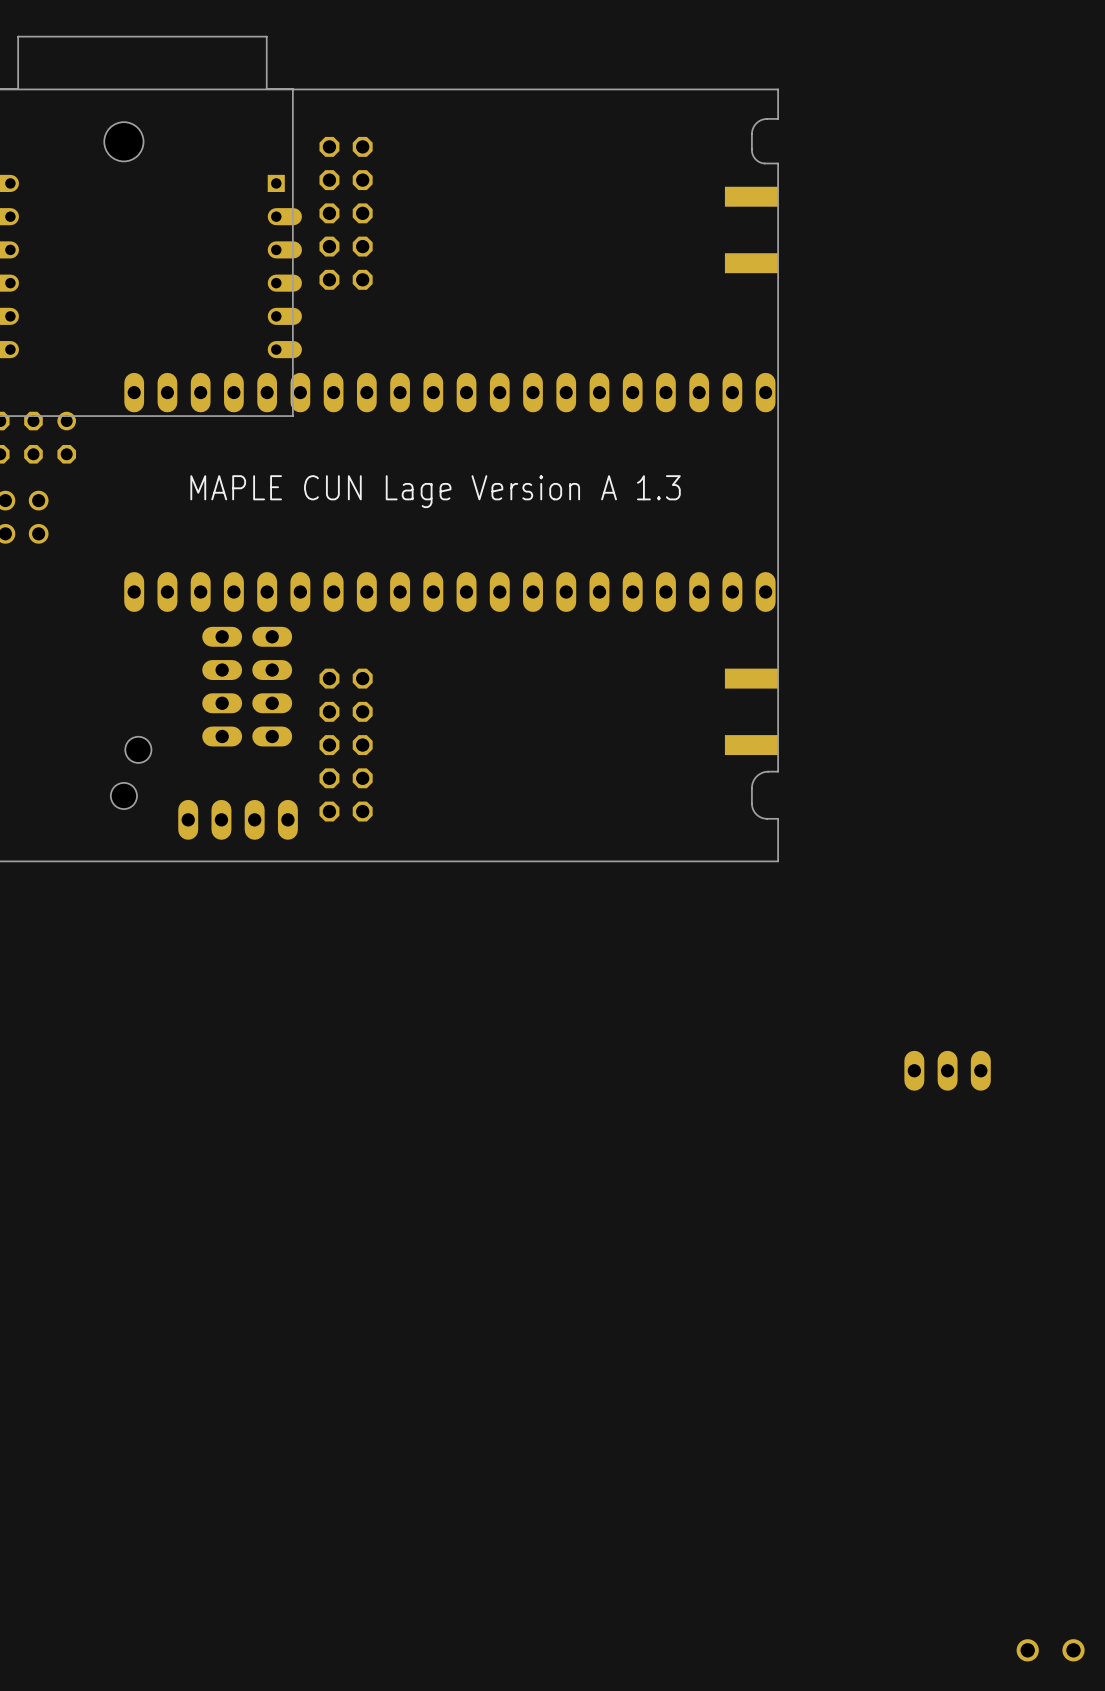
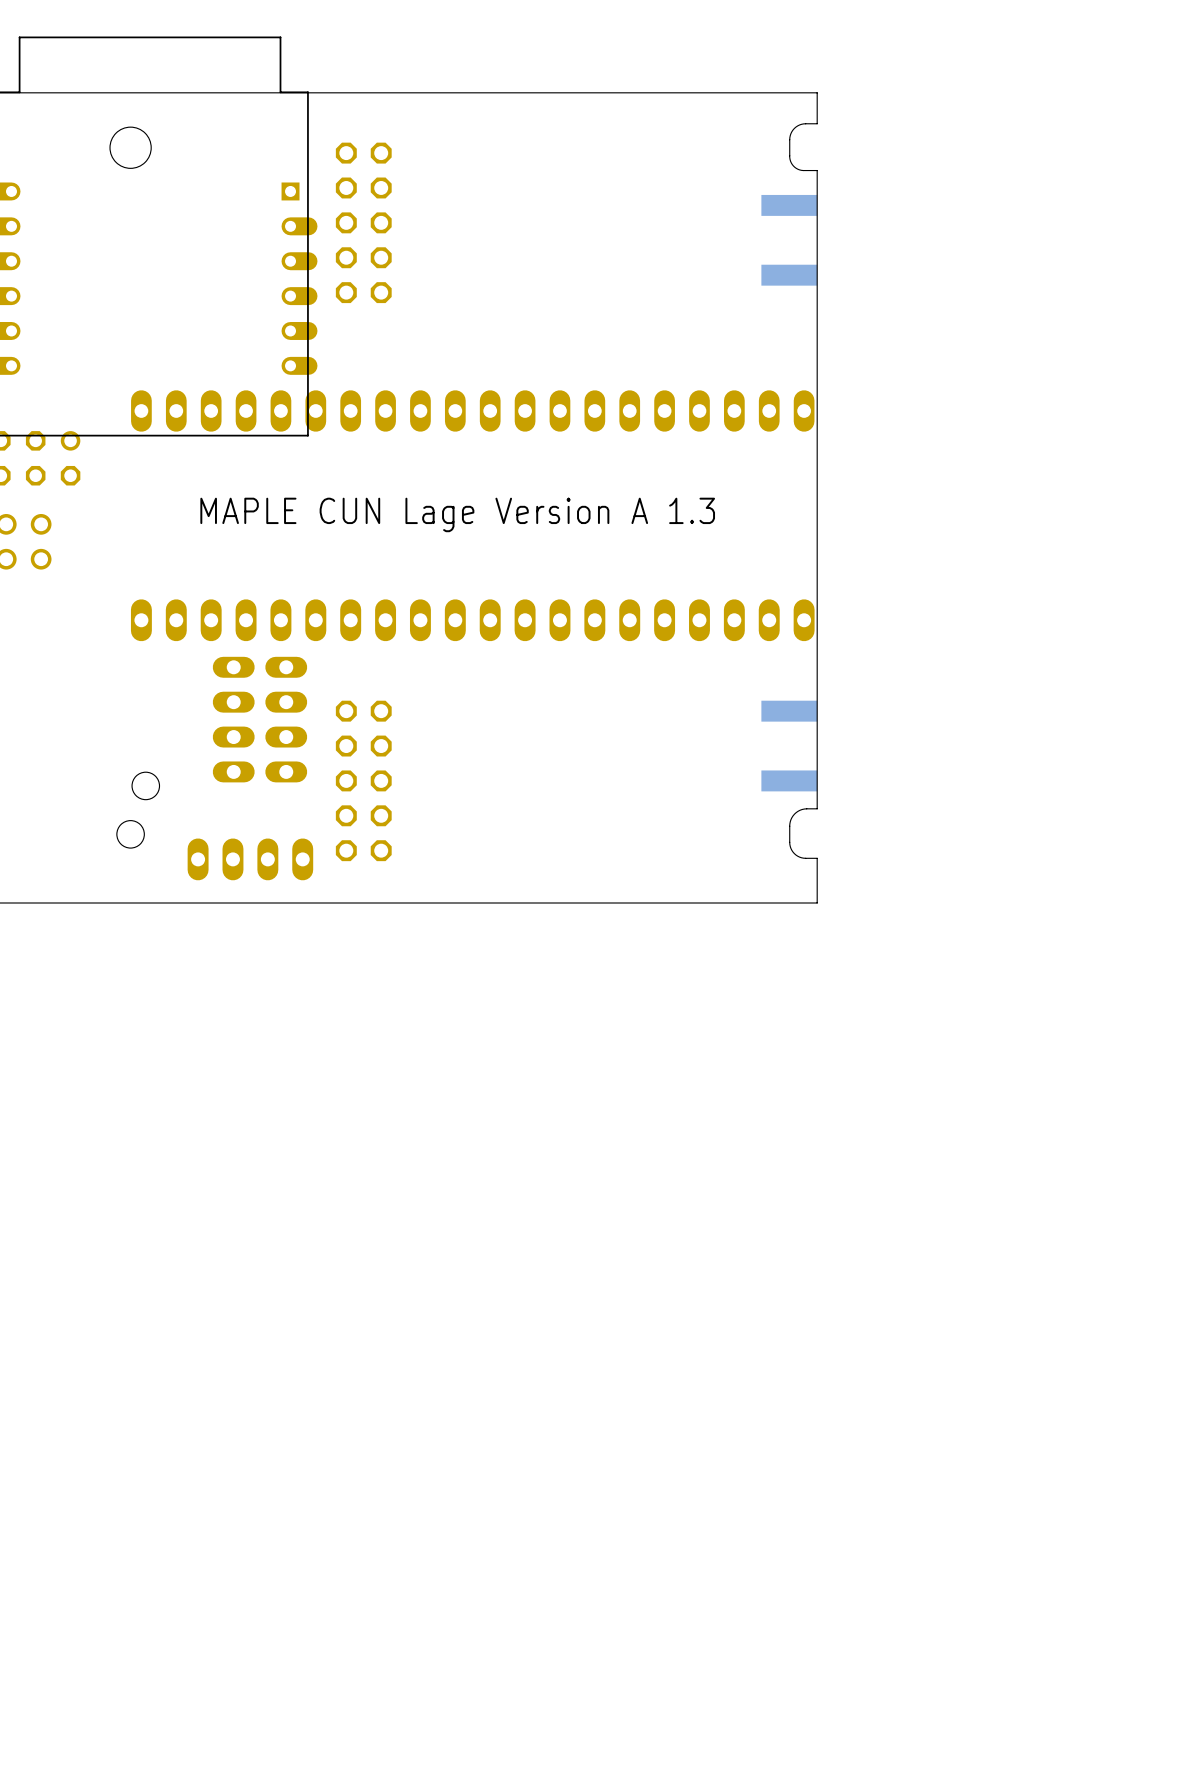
part: (947, 1070) -> none
part: (1050, 1650) -> none

